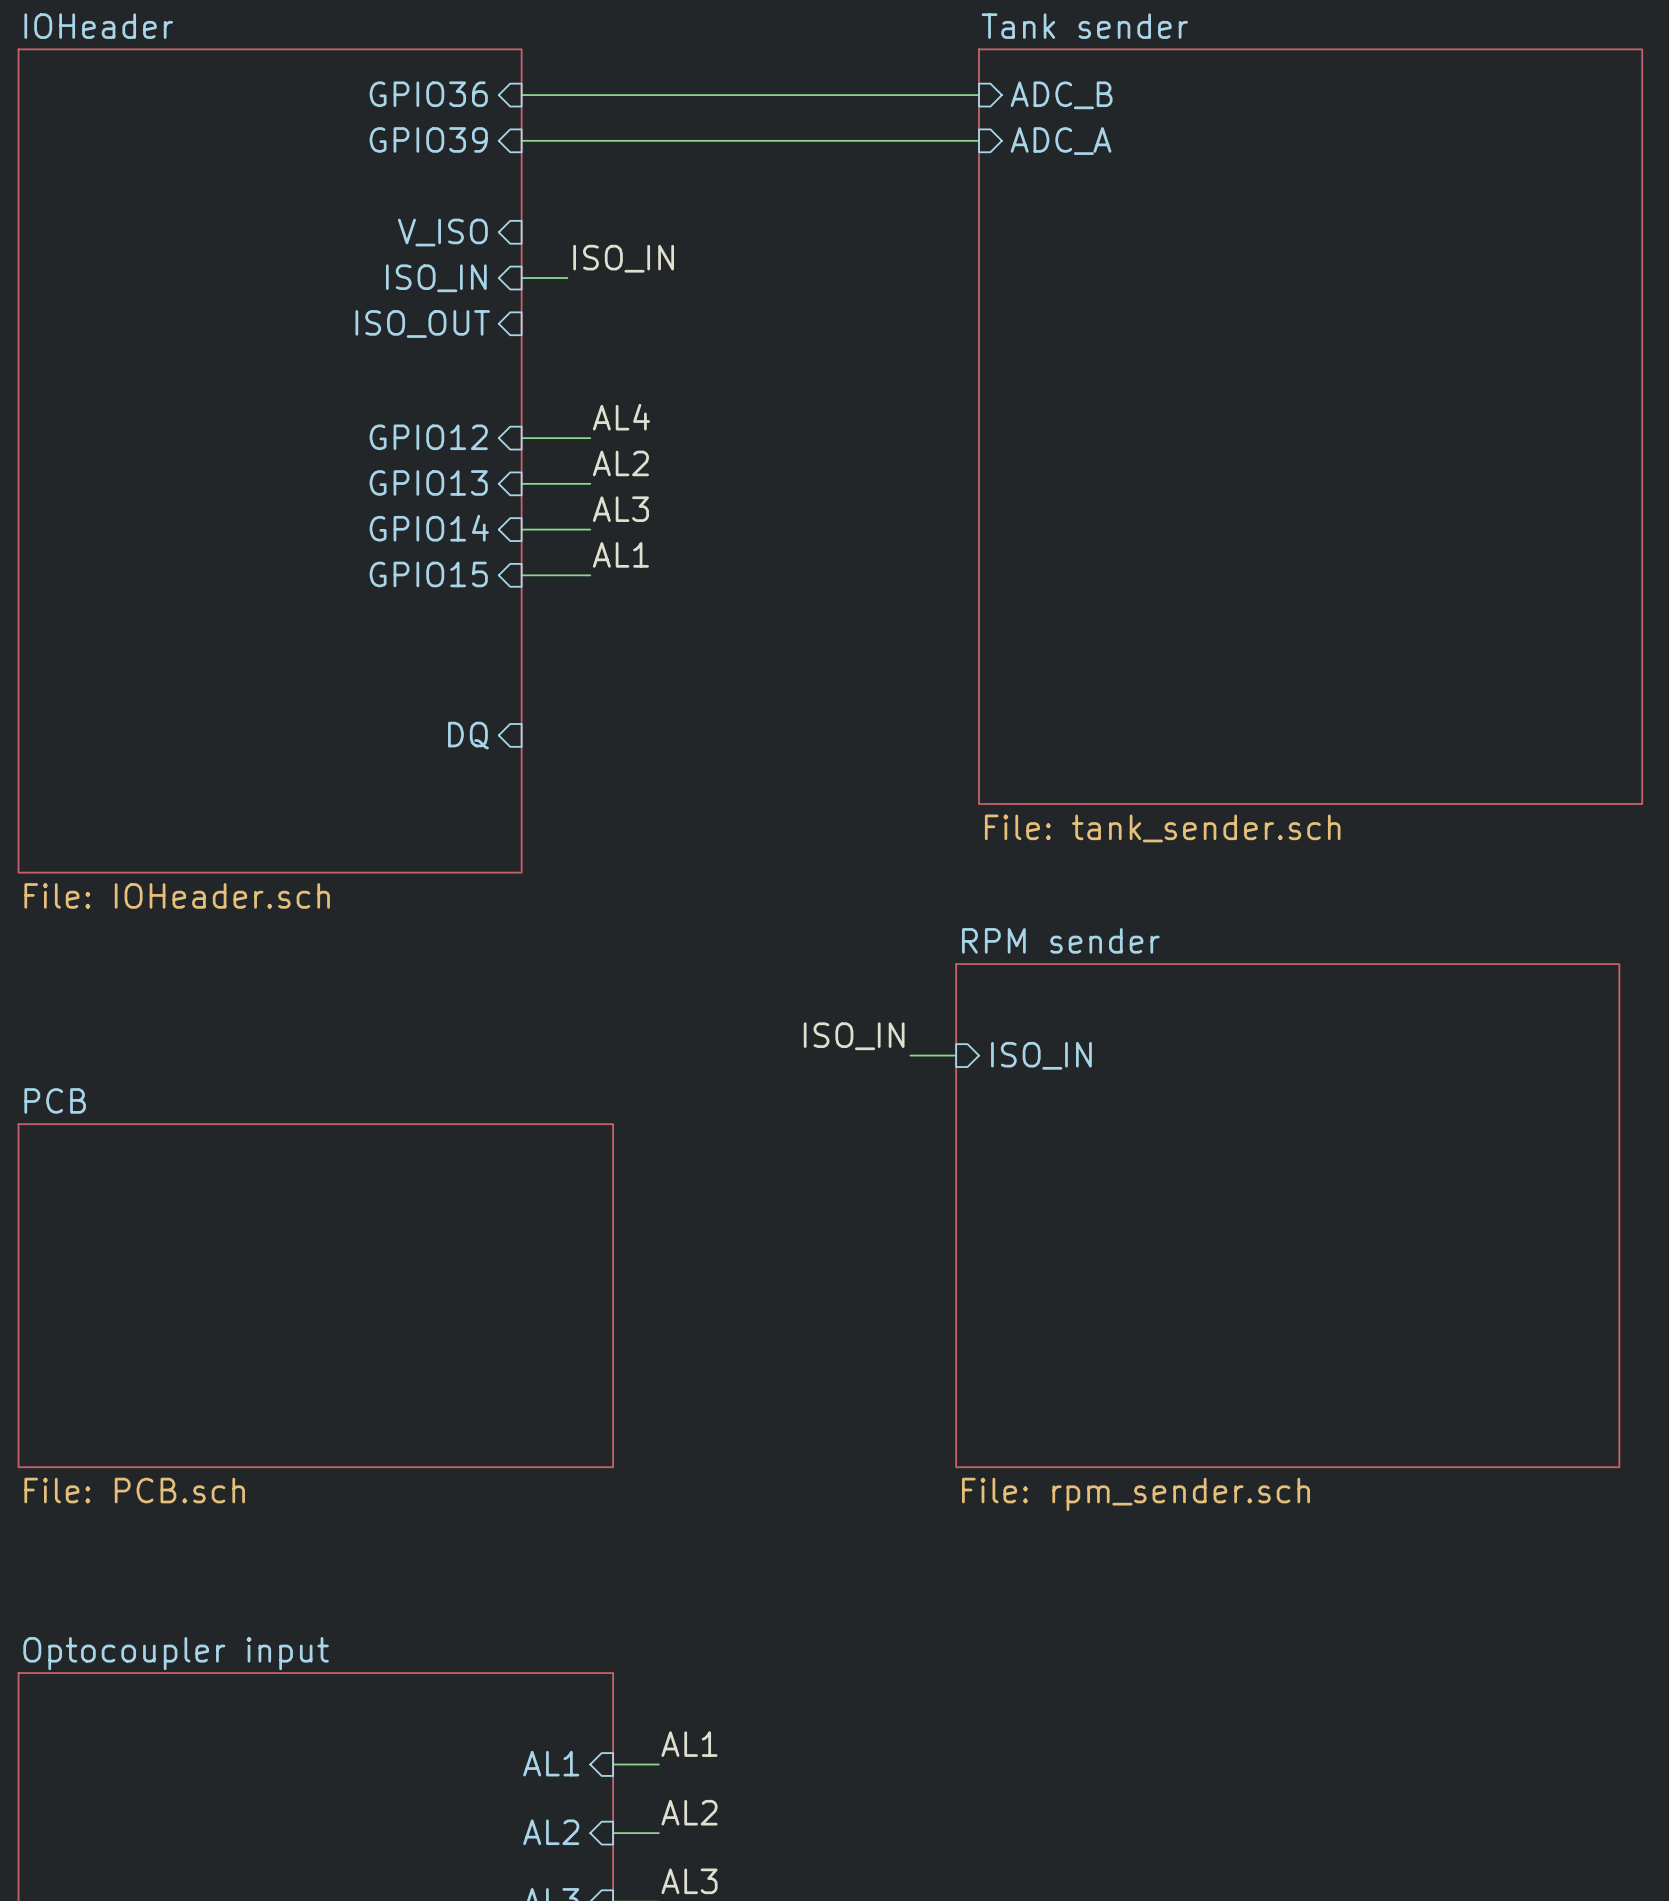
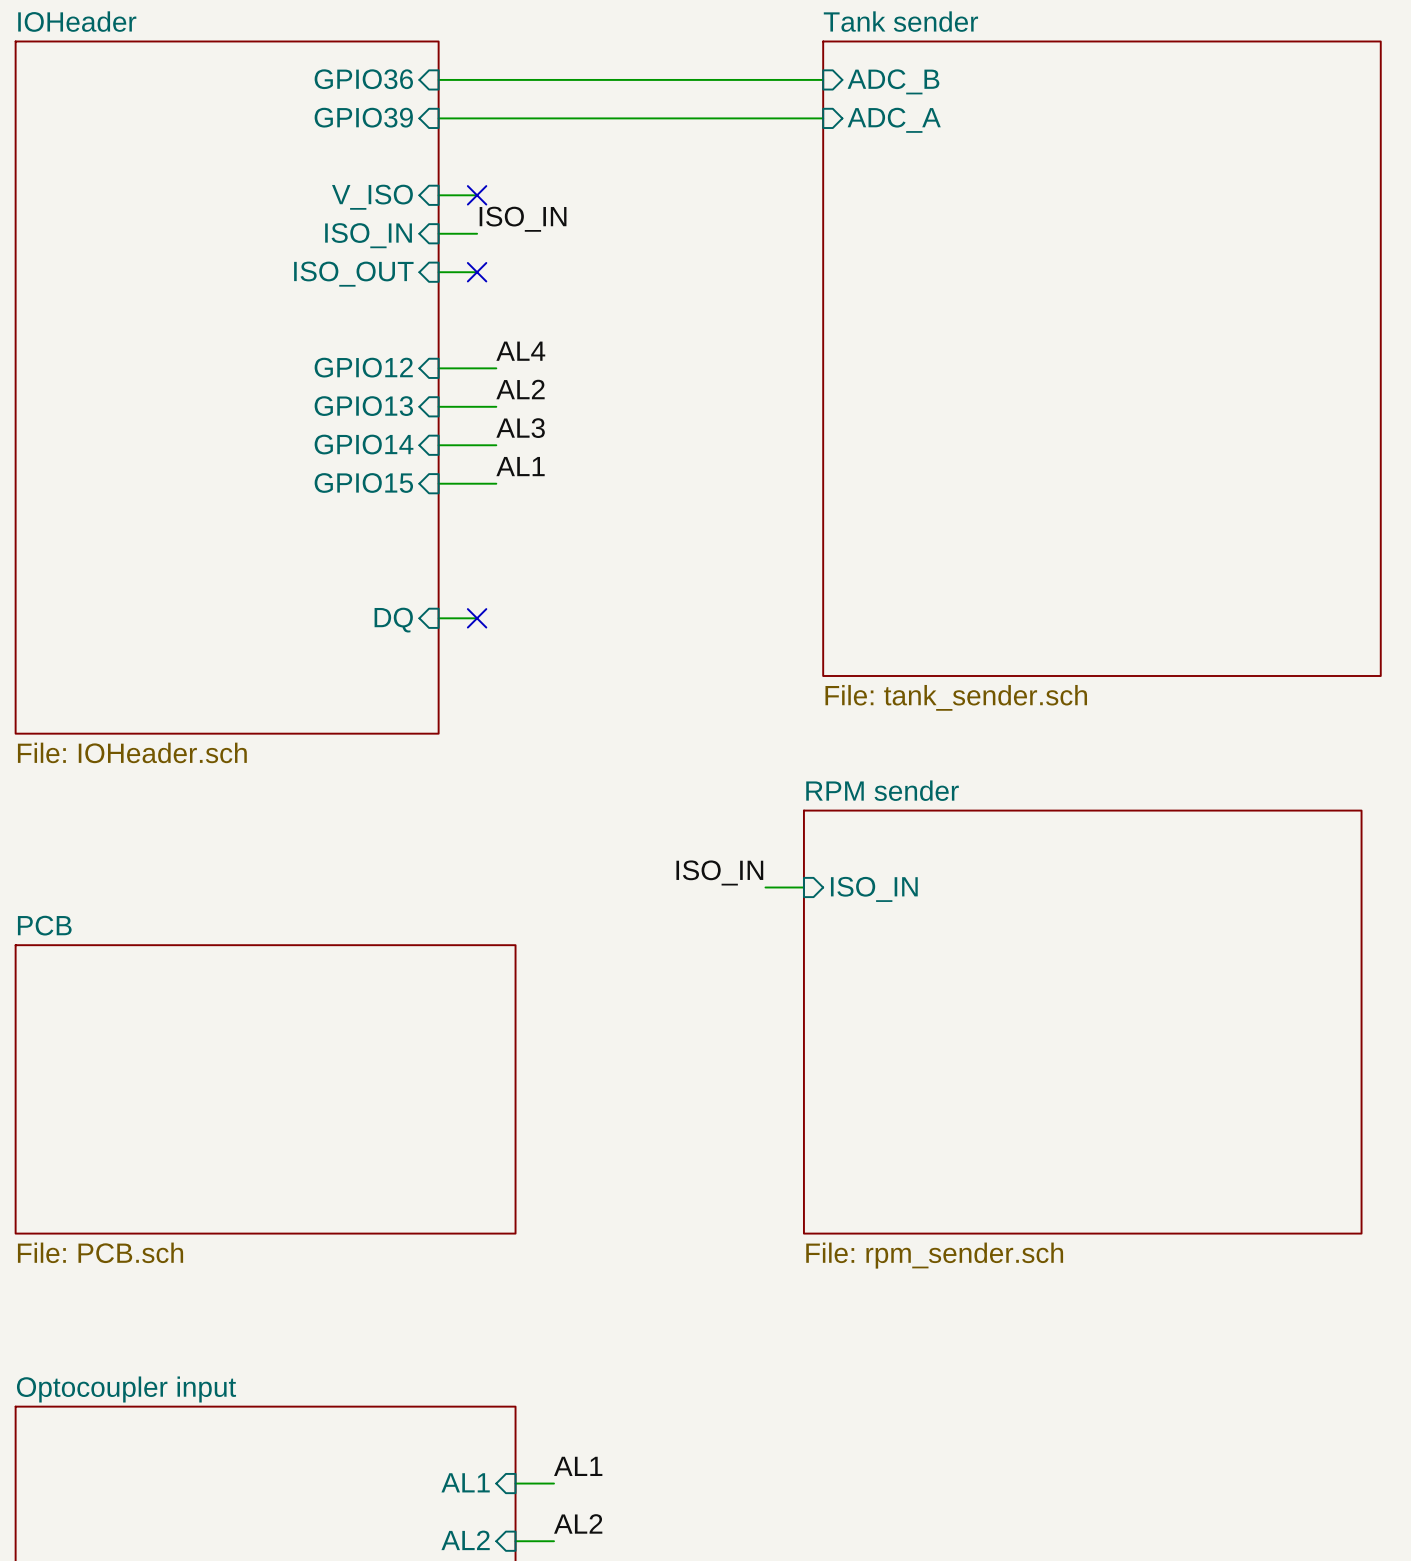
wire: none -> (438, 195) (477, 195)
no-connect mark: none -> (477, 195)
wire: none -> (438, 272) (477, 272)
no-connect mark: none -> (477, 272)
wire: none -> (438, 618) (477, 618)
no-connect mark: none -> (477, 618)

